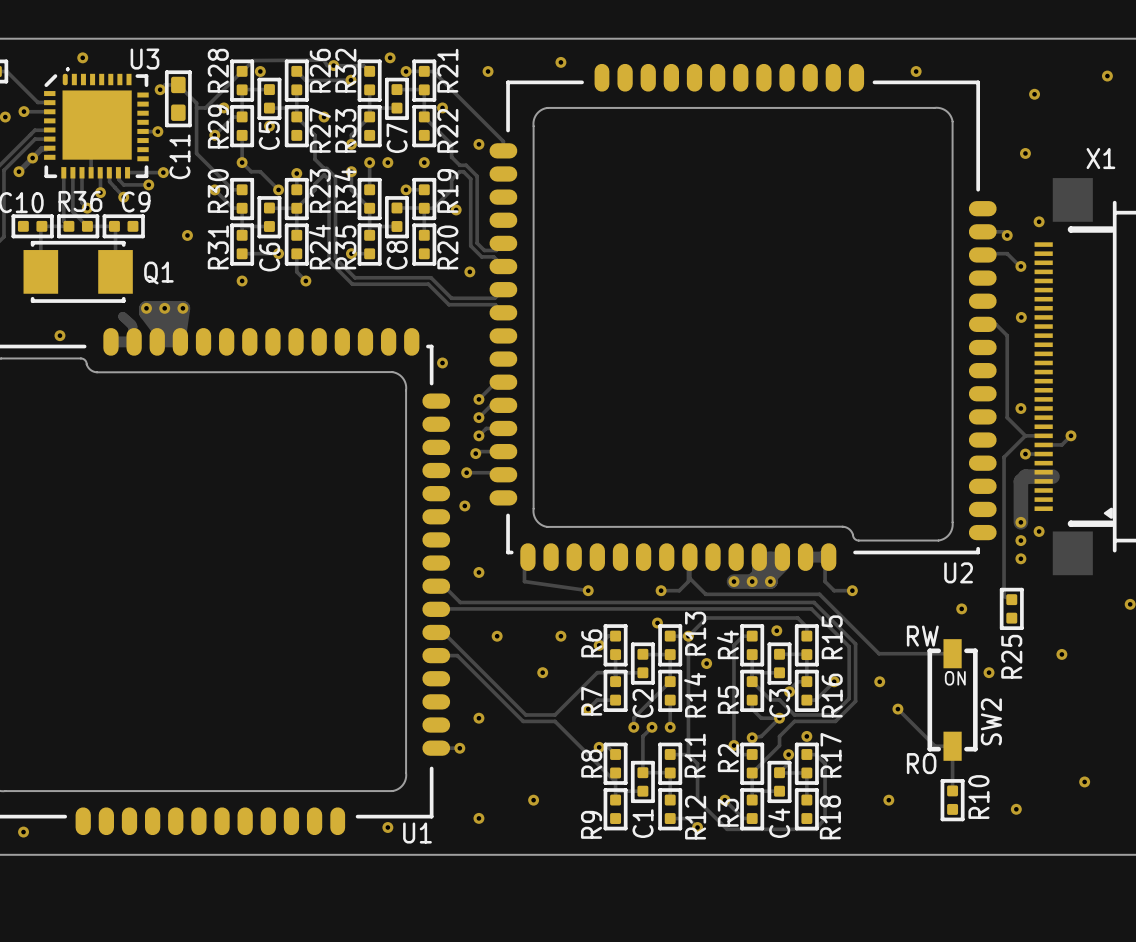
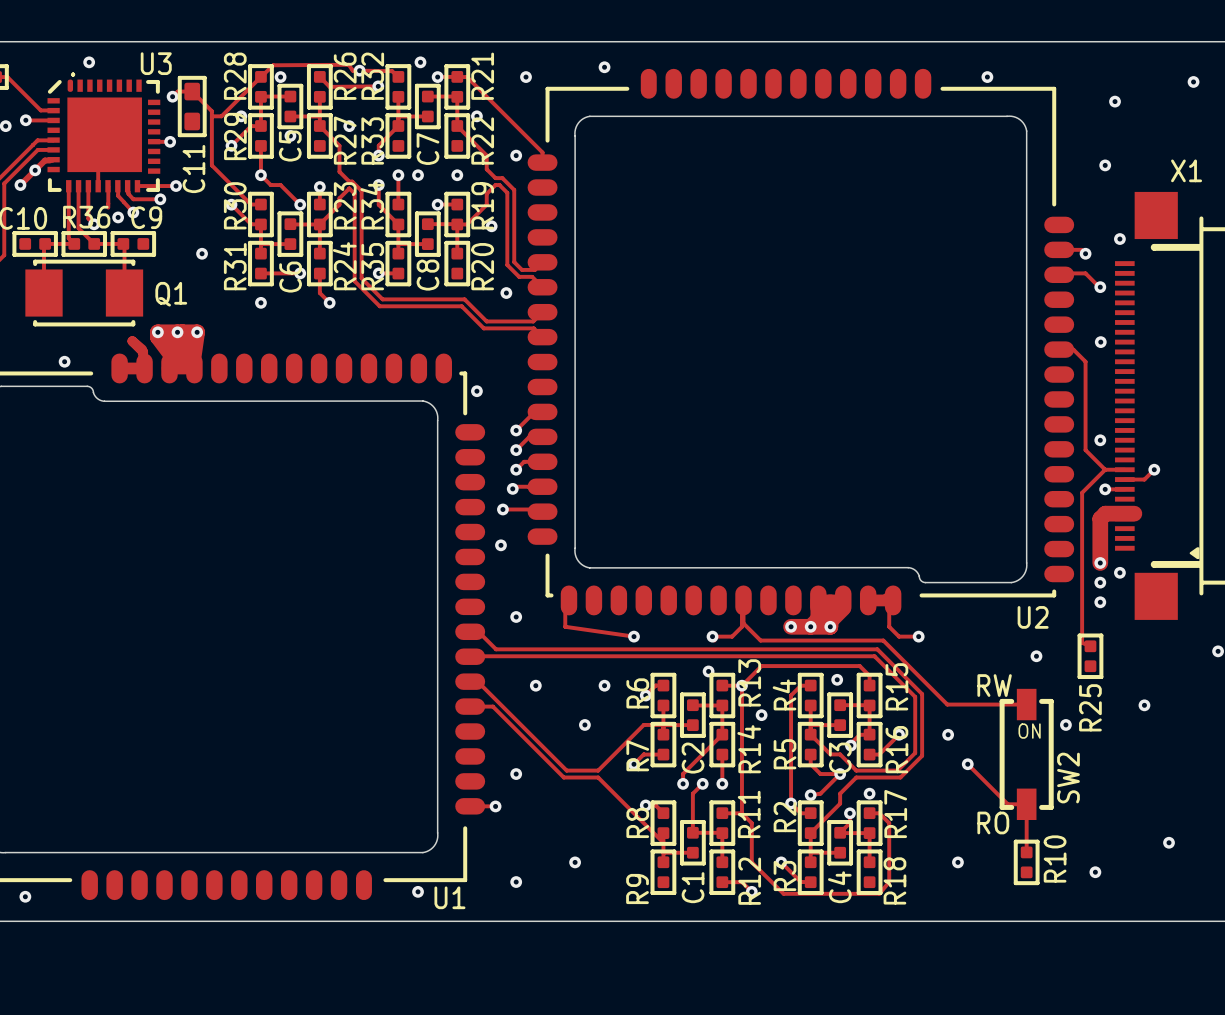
via position: (100, 192) -> (118, 217)

